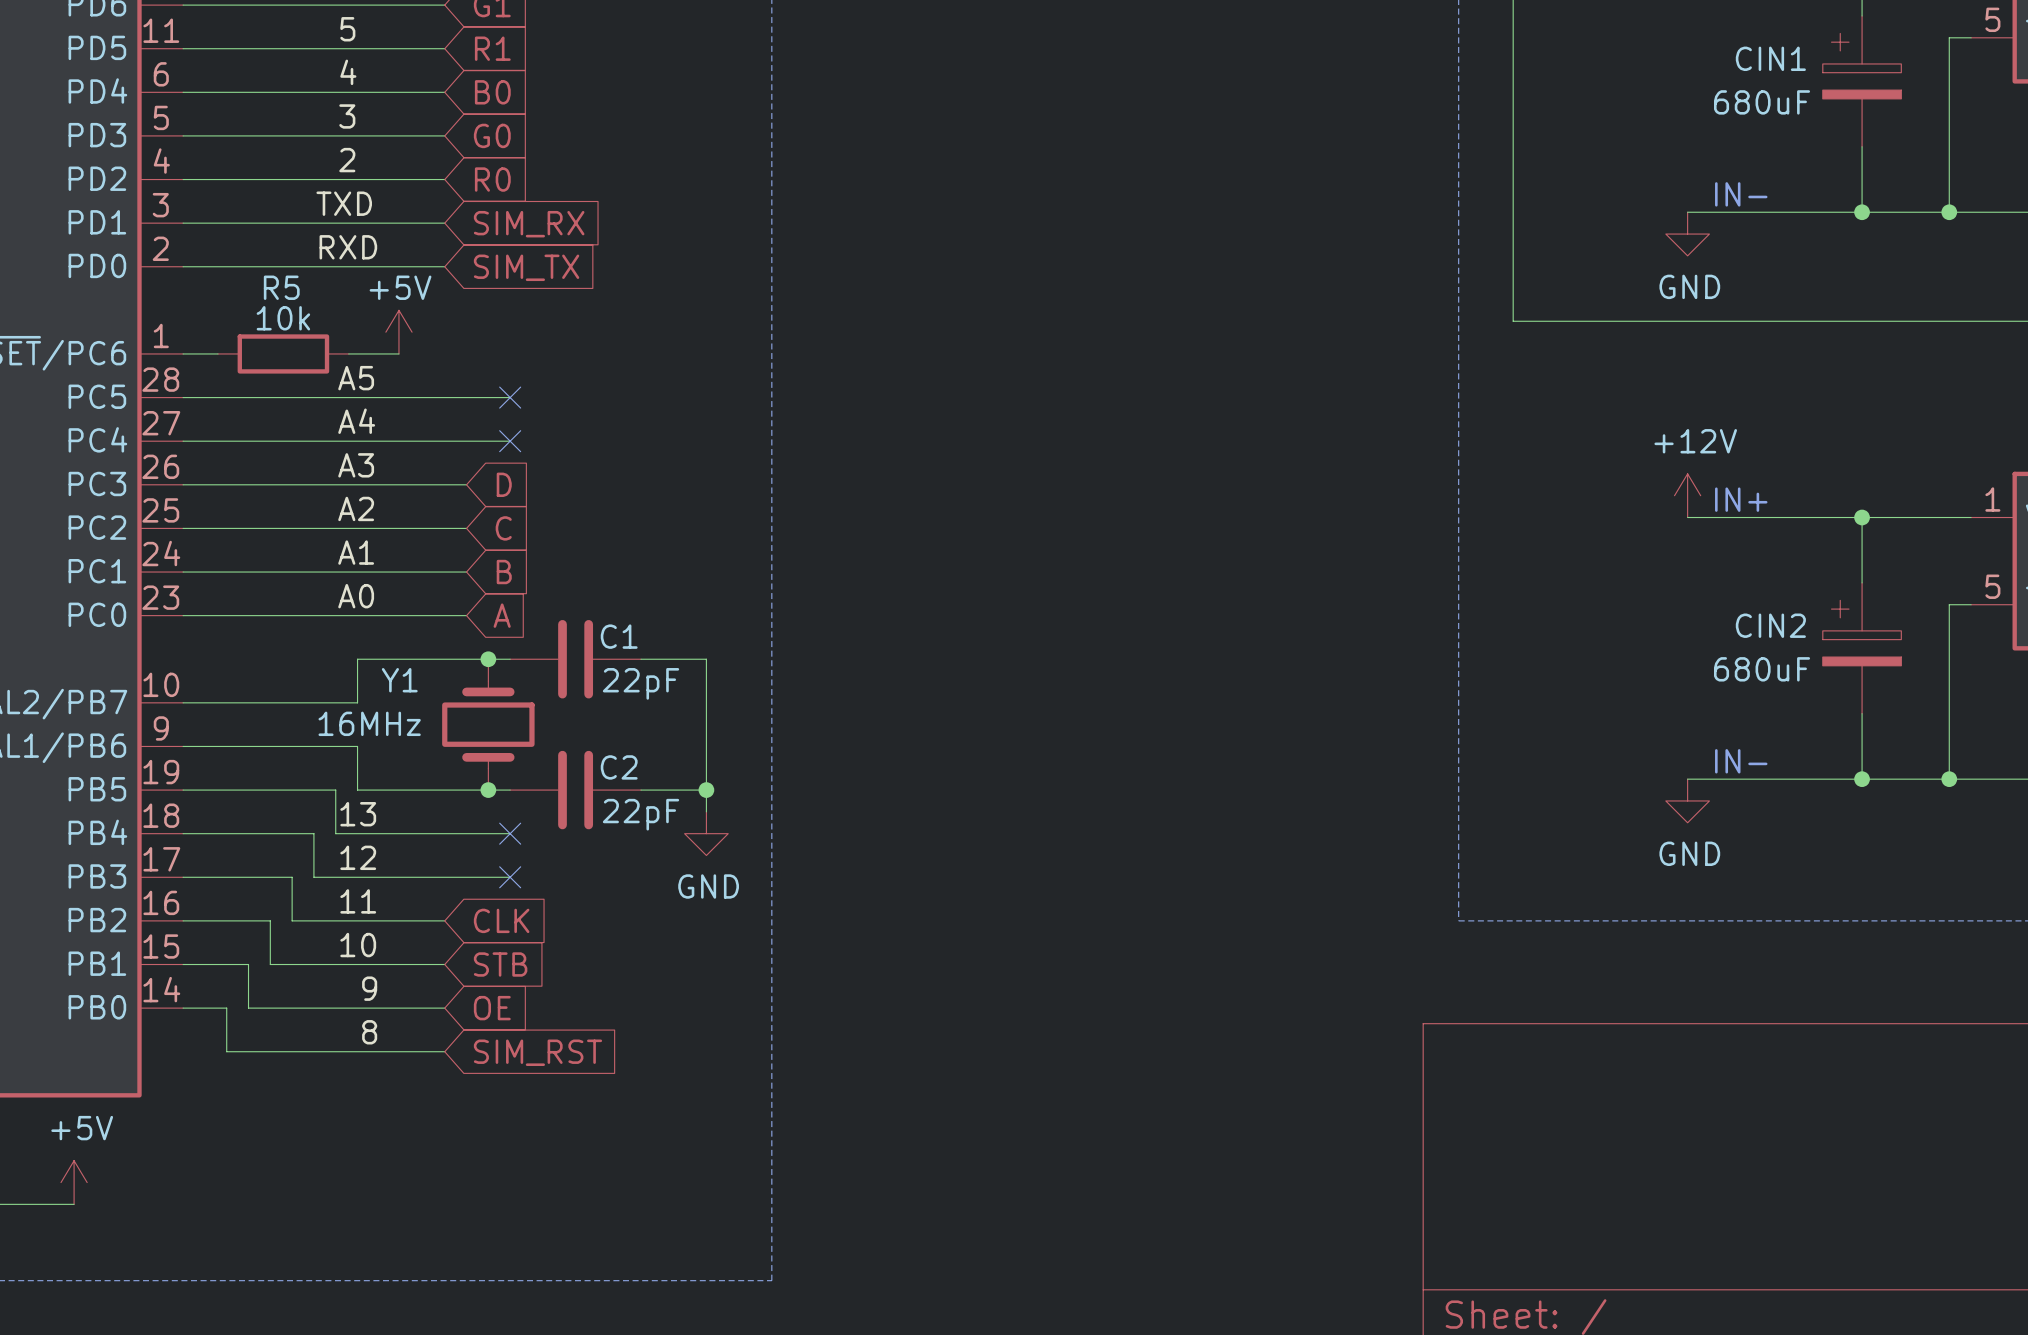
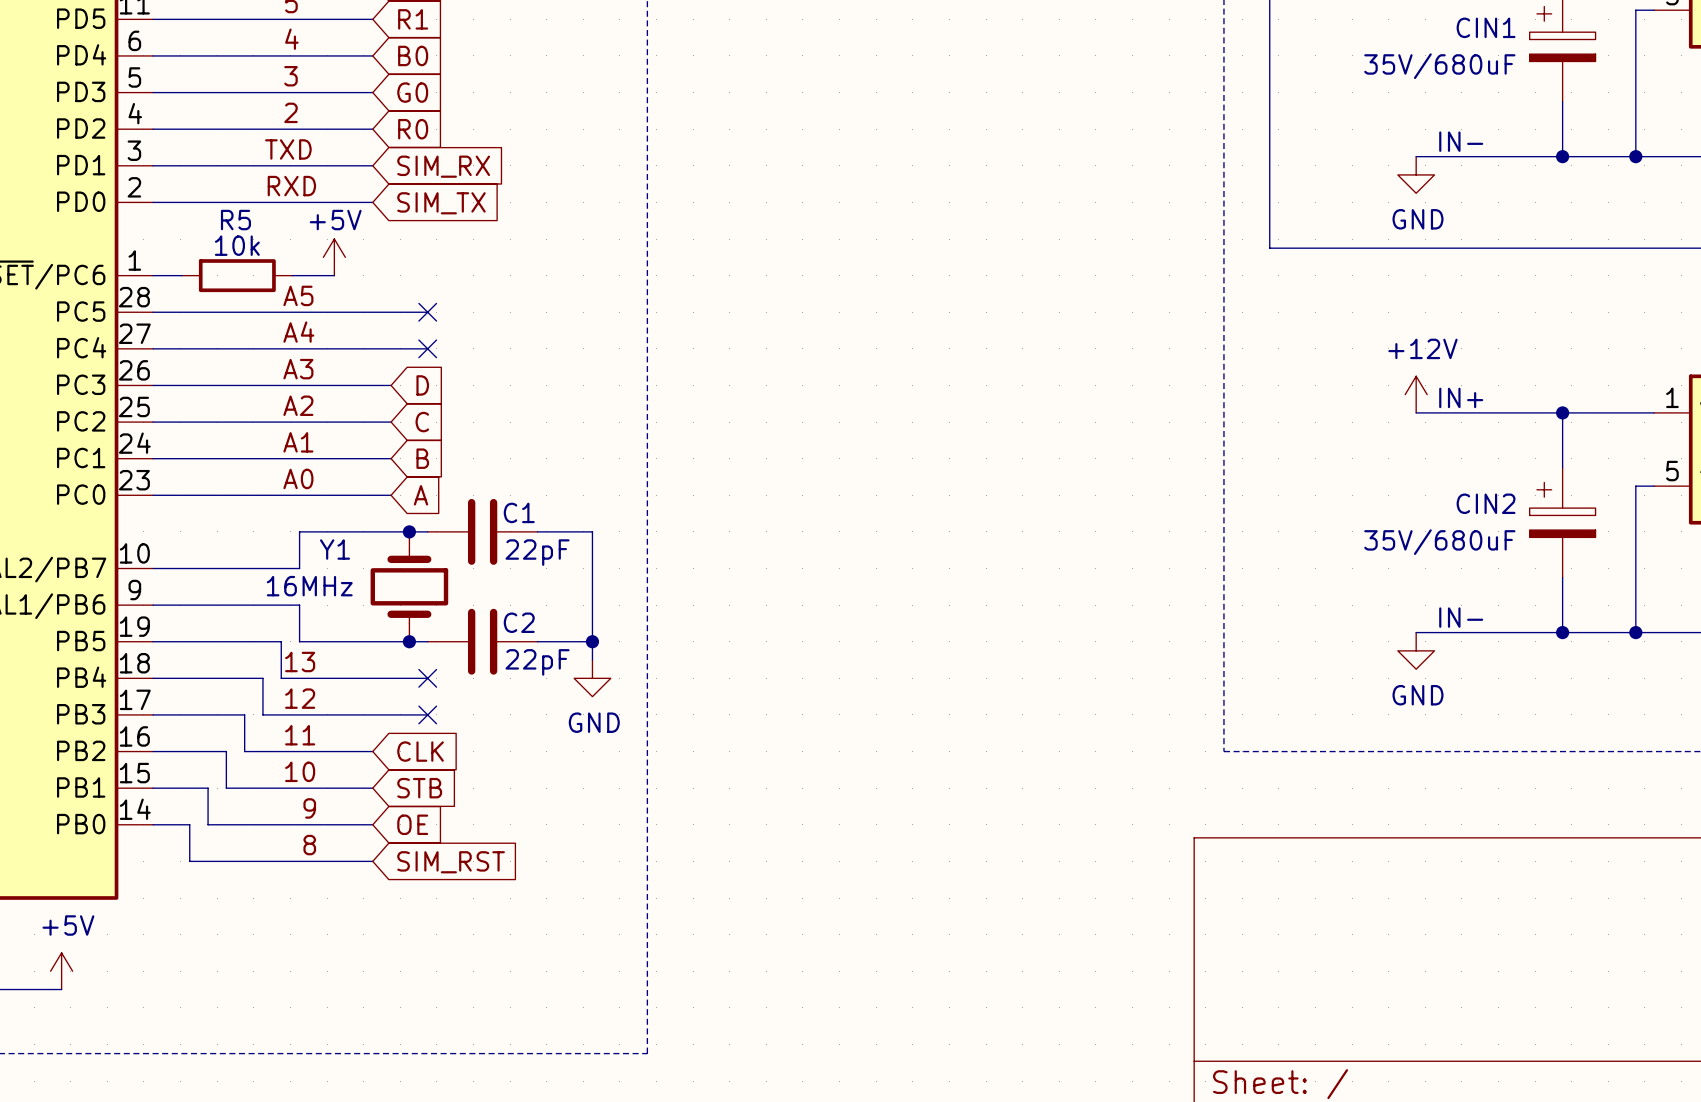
CIN1 value: 680uF (1762, 102) -> 35V/680uF (1439, 66)
CIN2 value: 680uF (1762, 669) -> 35V/680uF (1439, 542)

